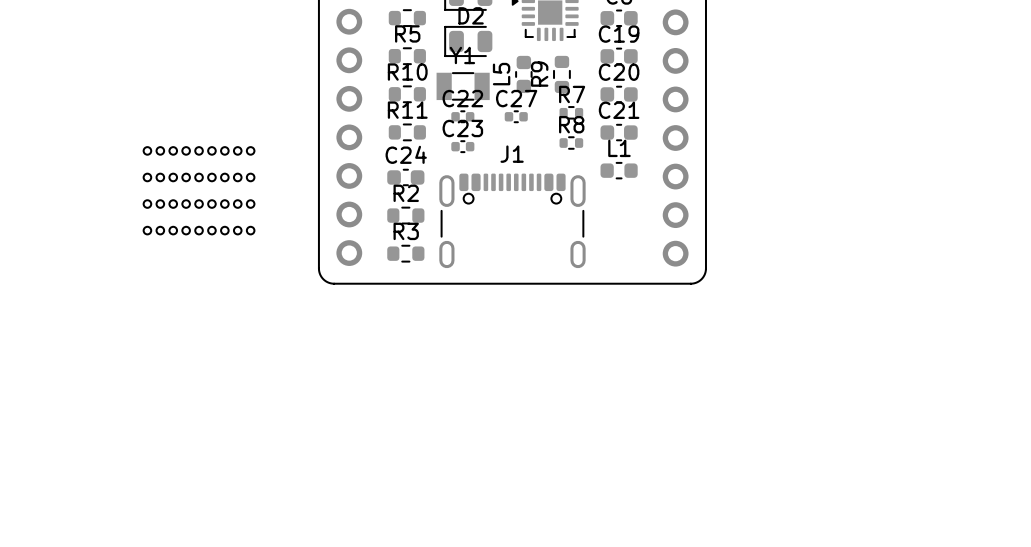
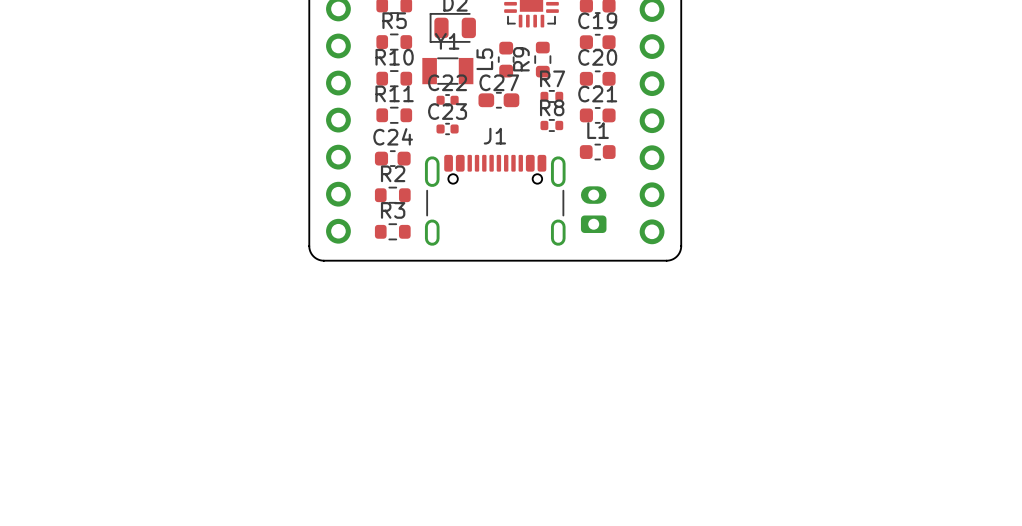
C27 footprint: [504, 110, 528, 124] -> [478, 91, 520, 109]
part: (199, 150) -> none
part: (199, 177) -> none
part: (199, 204) -> none
part: (199, 230) -> none
part: none -> (593, 209)

